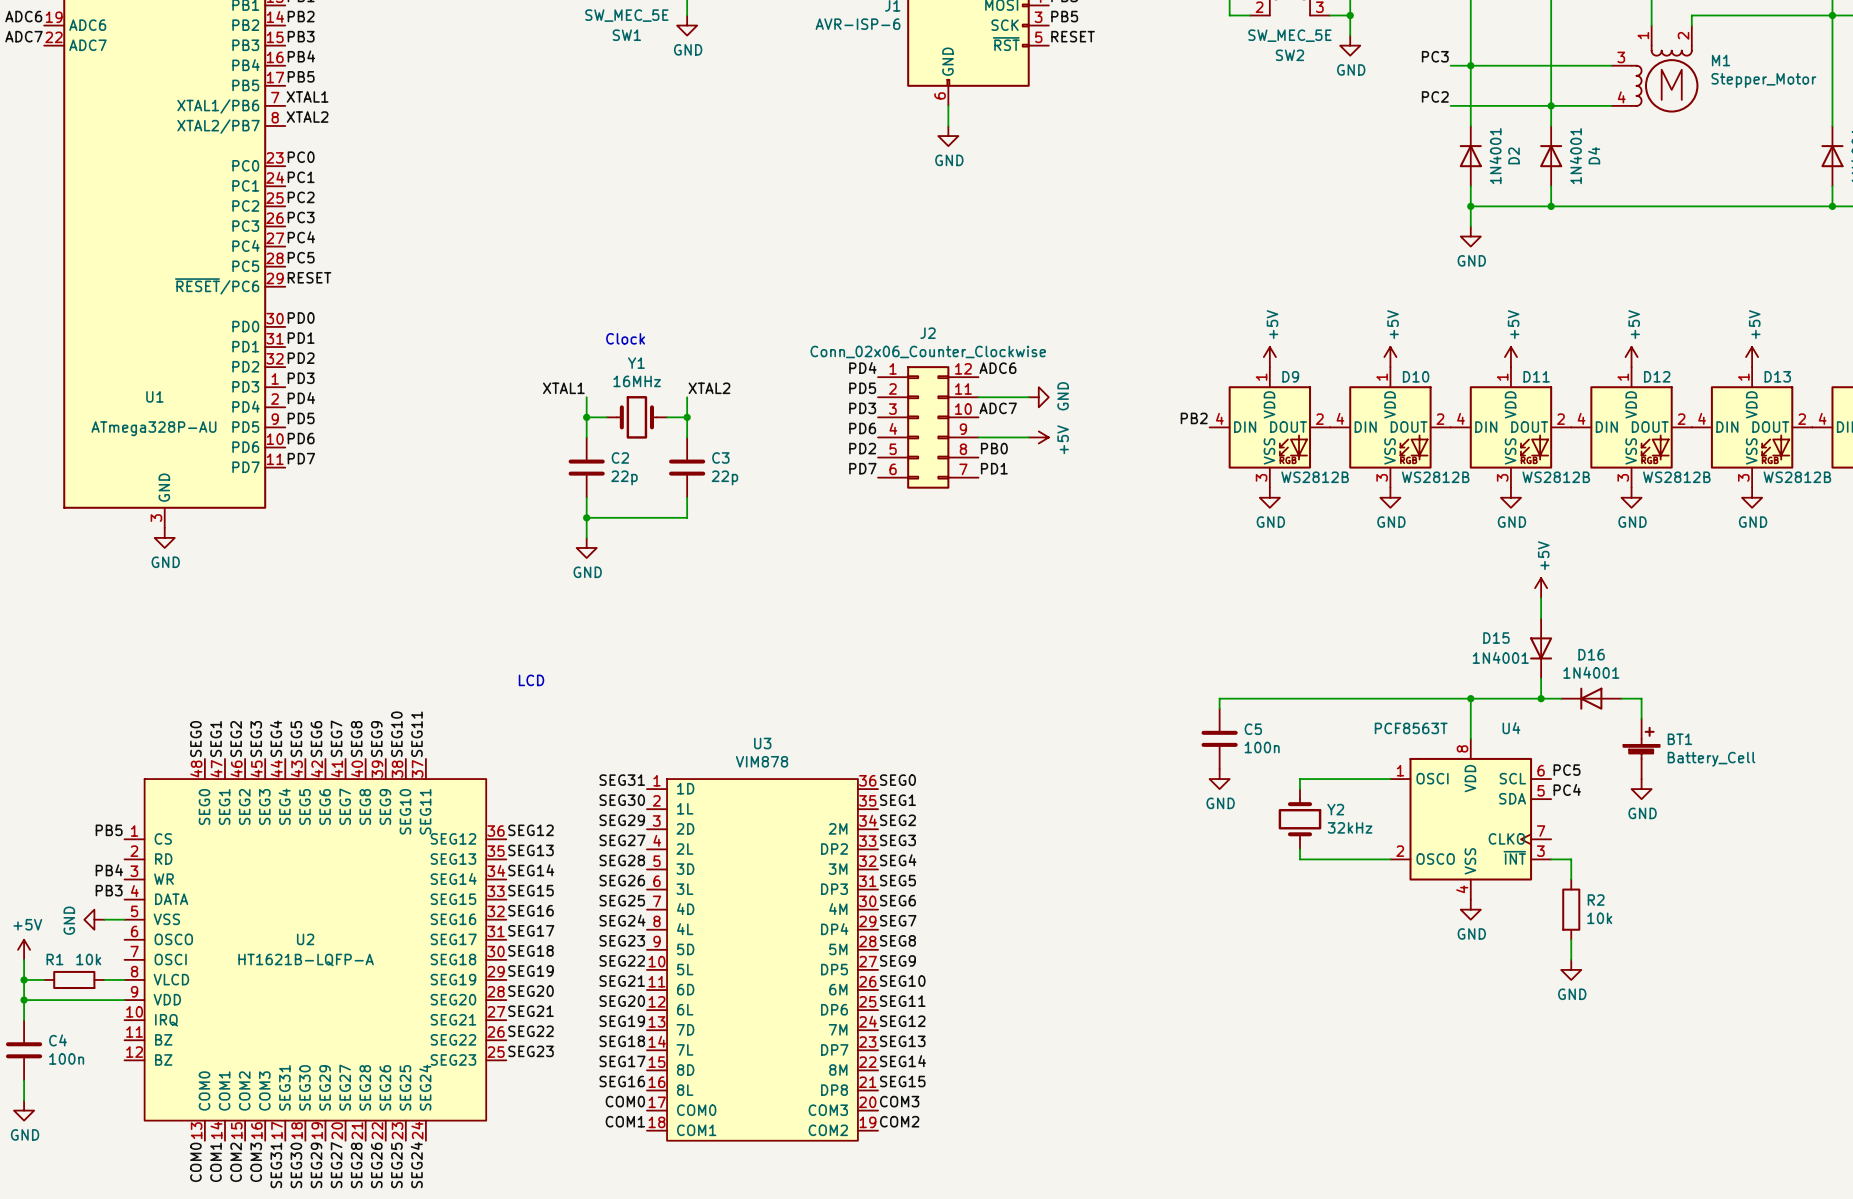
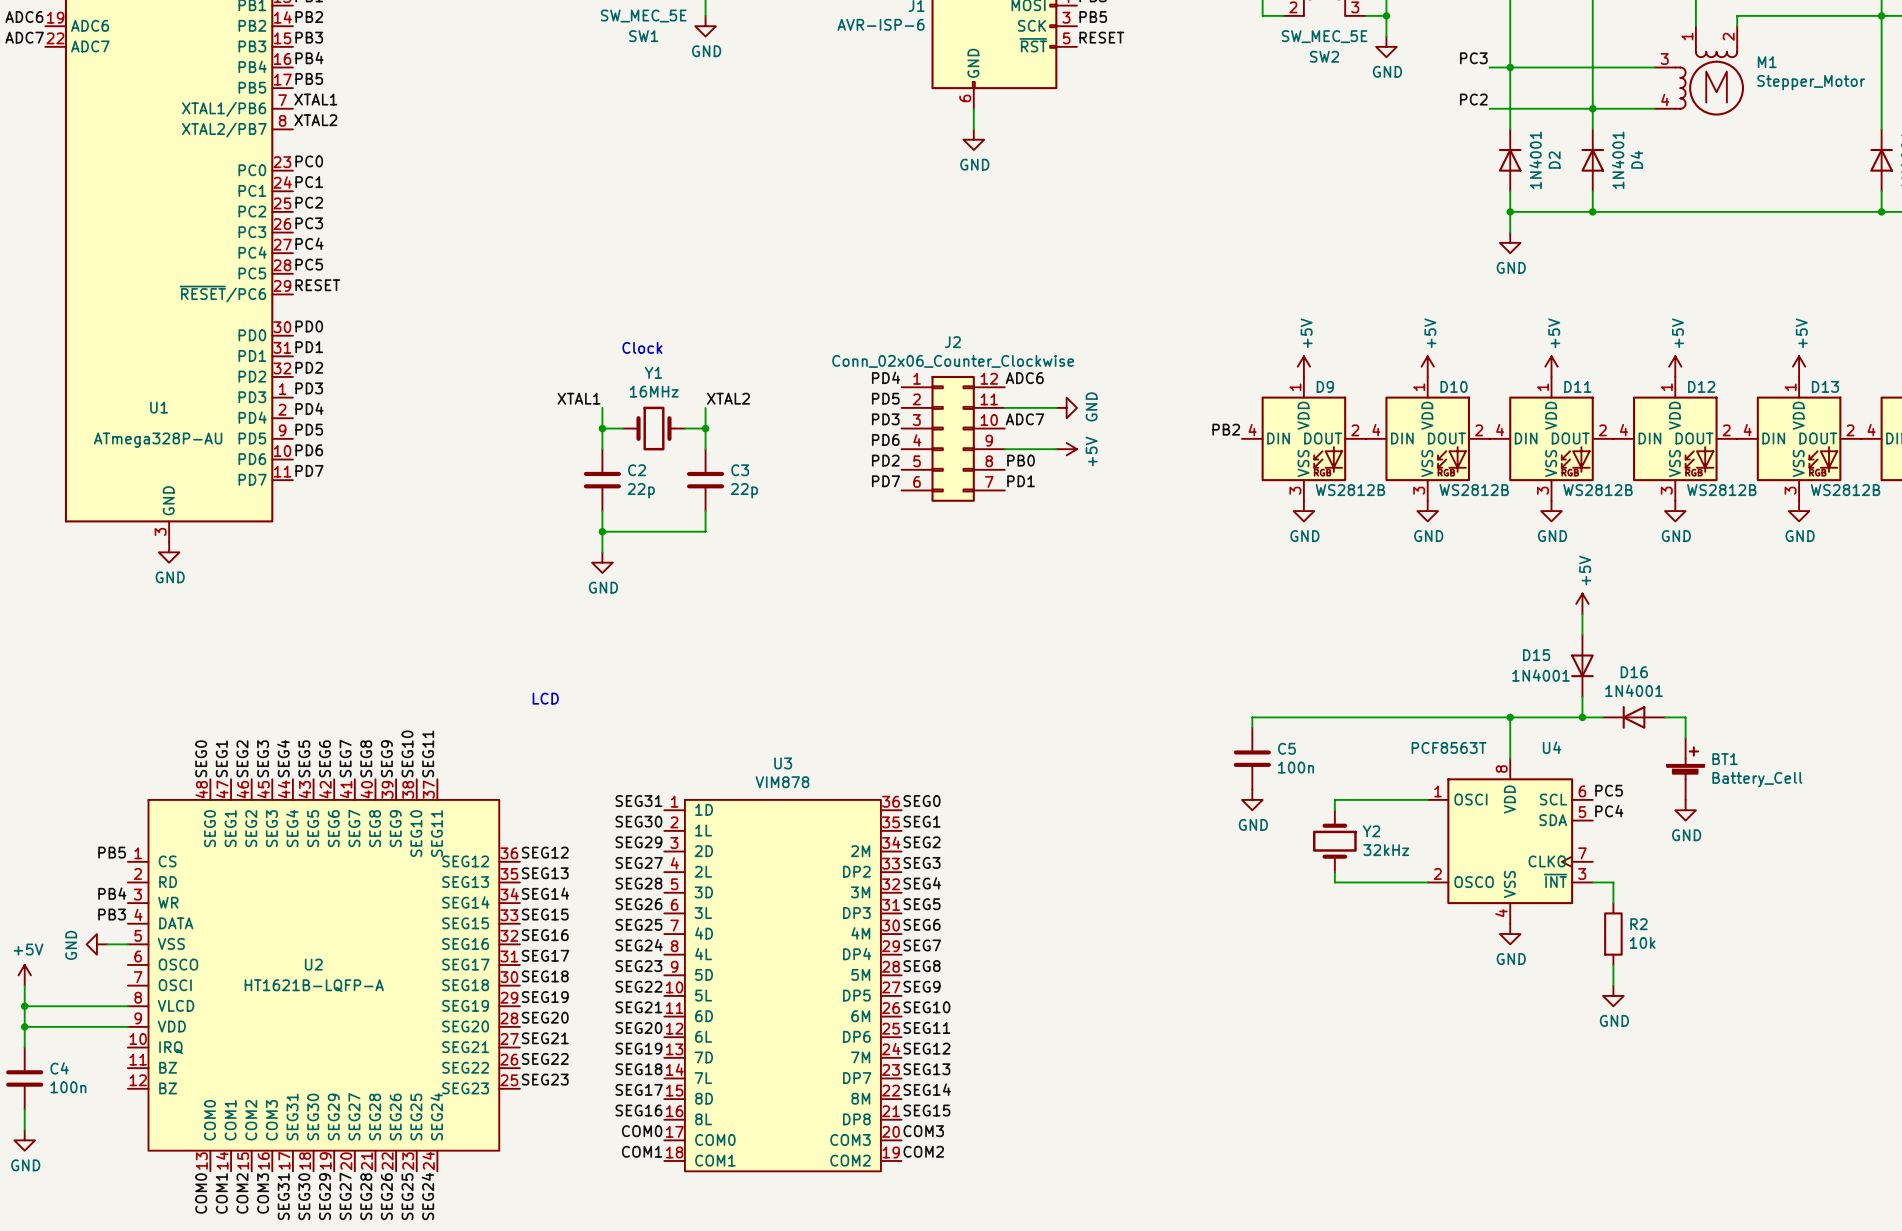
wire: none -> (45, 1006) (107, 1006)
R1: 10k (74, 979) -> none

